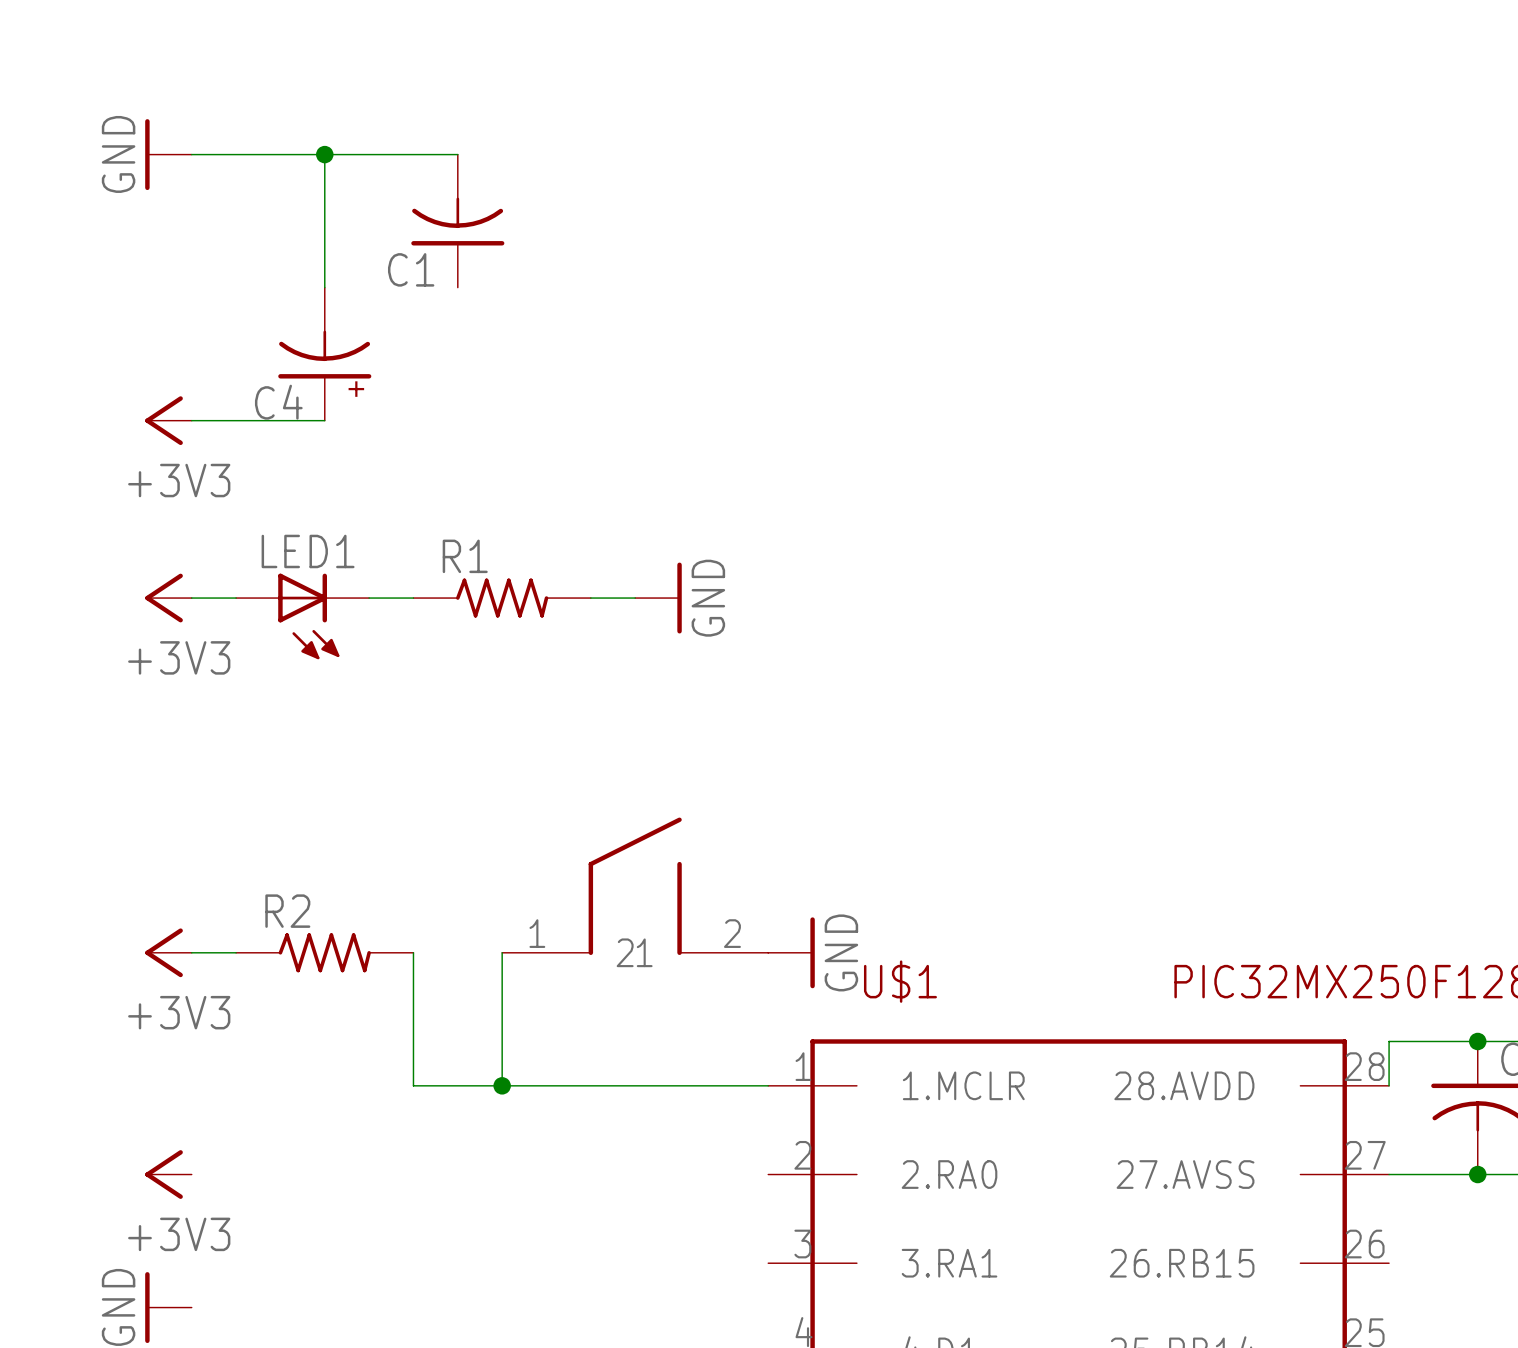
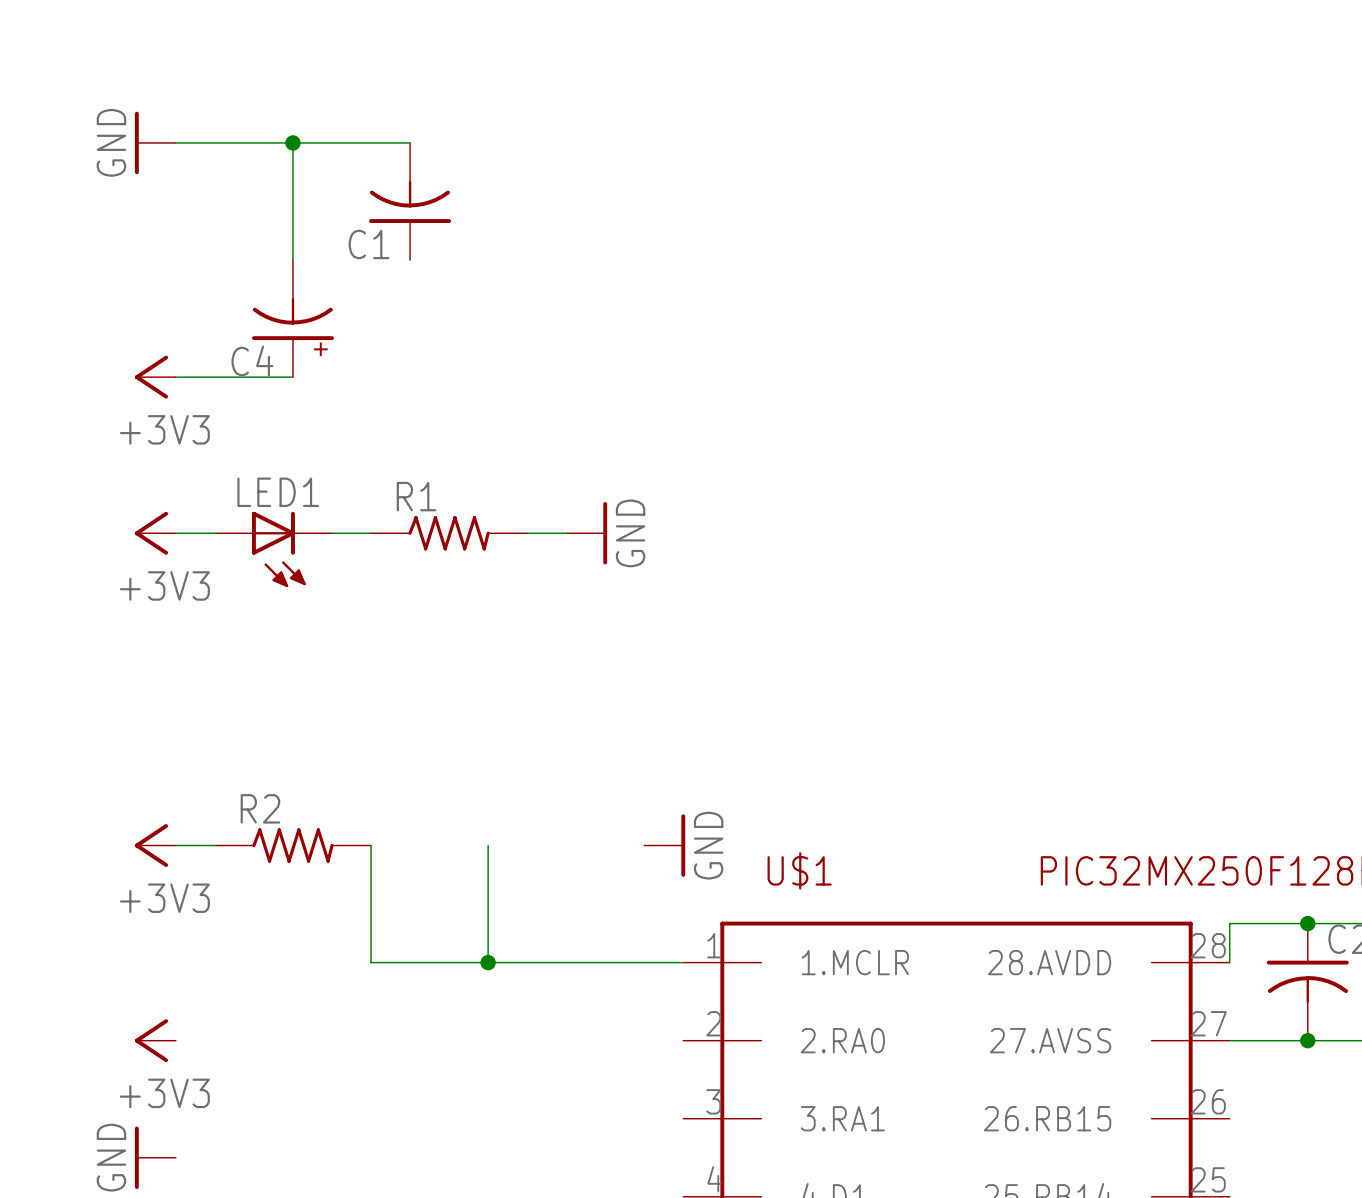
part: (635, 886) -> none
wire: (502, 952) (502, 1085) -> (488, 845) (488, 962)
power symbol position: GND (791, 952) -> GND (664, 845)
junction position: (502, 1085) -> (488, 962)

